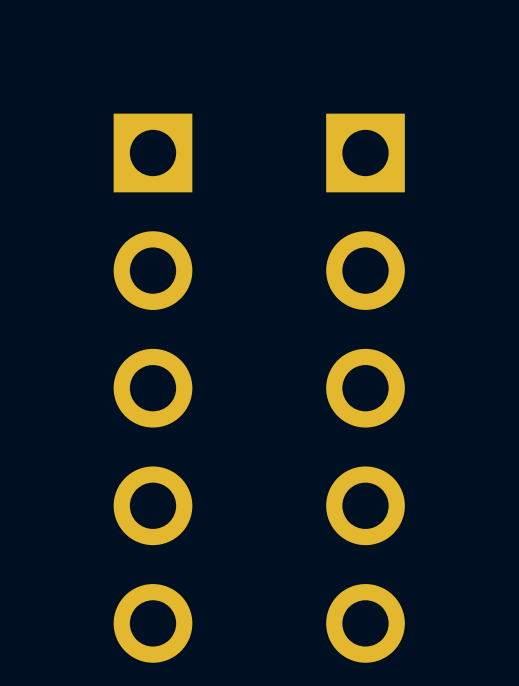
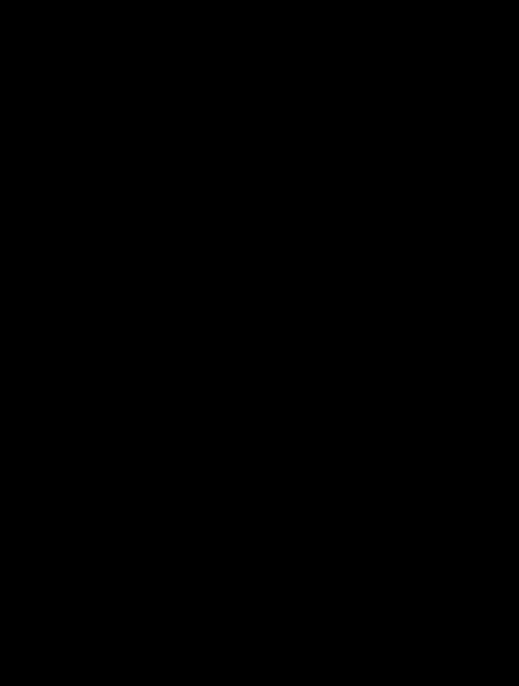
part: (152, 388) -> none
part: (365, 388) -> none

